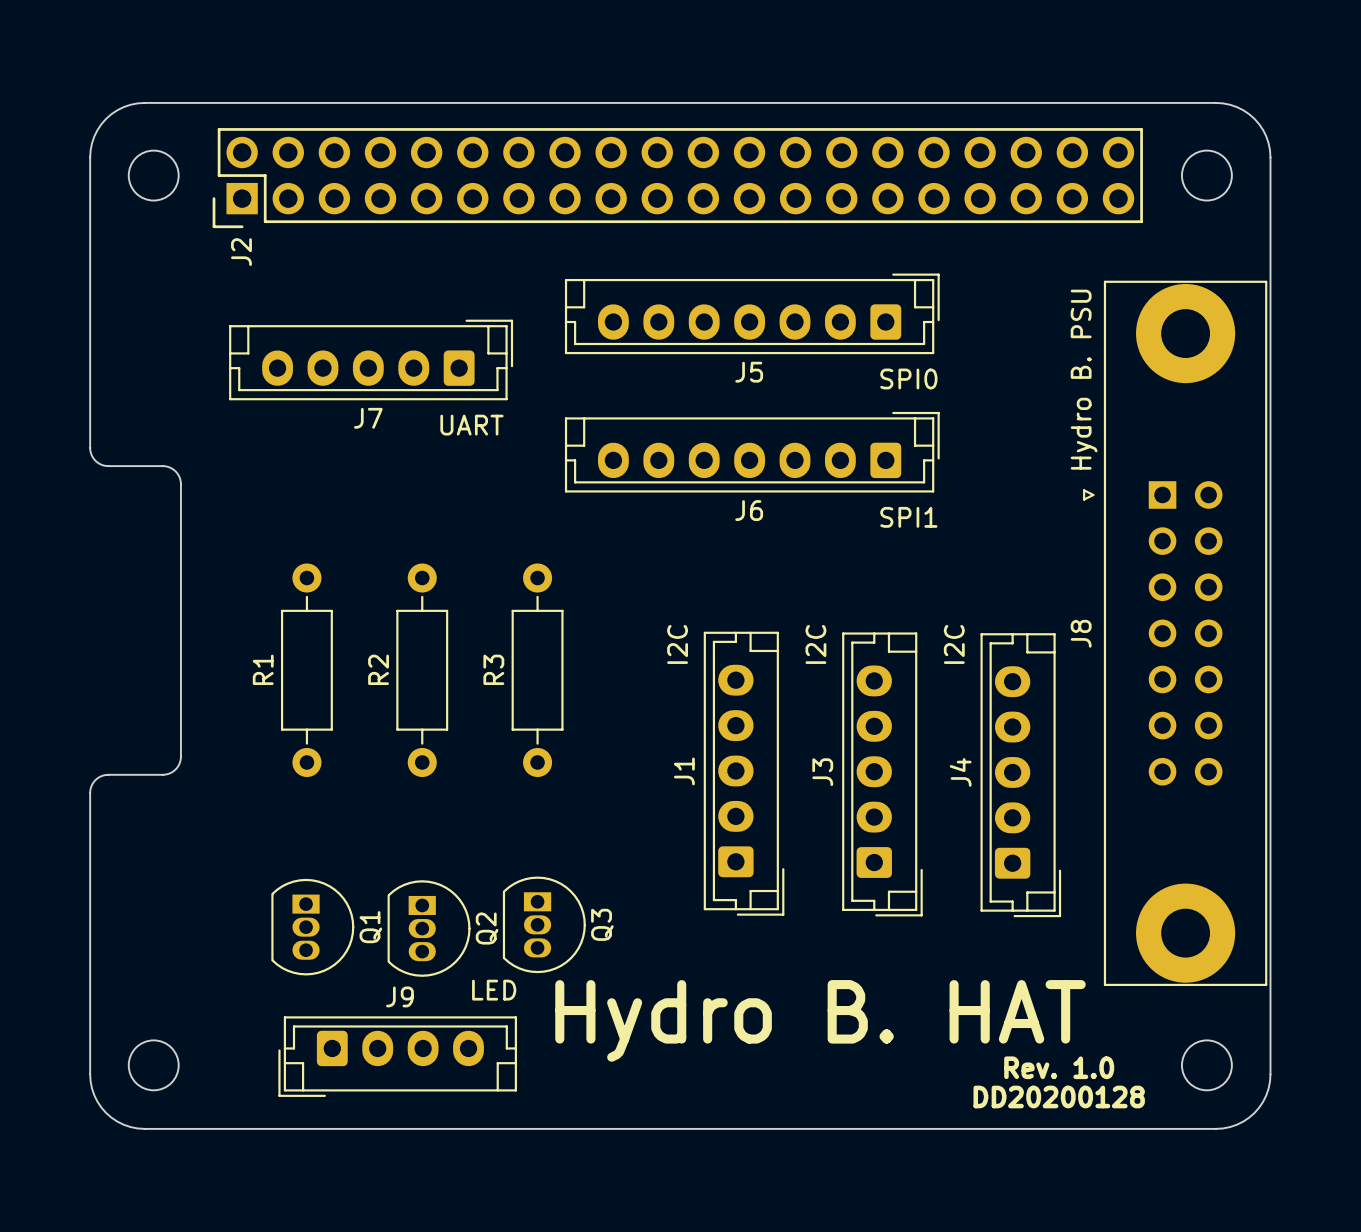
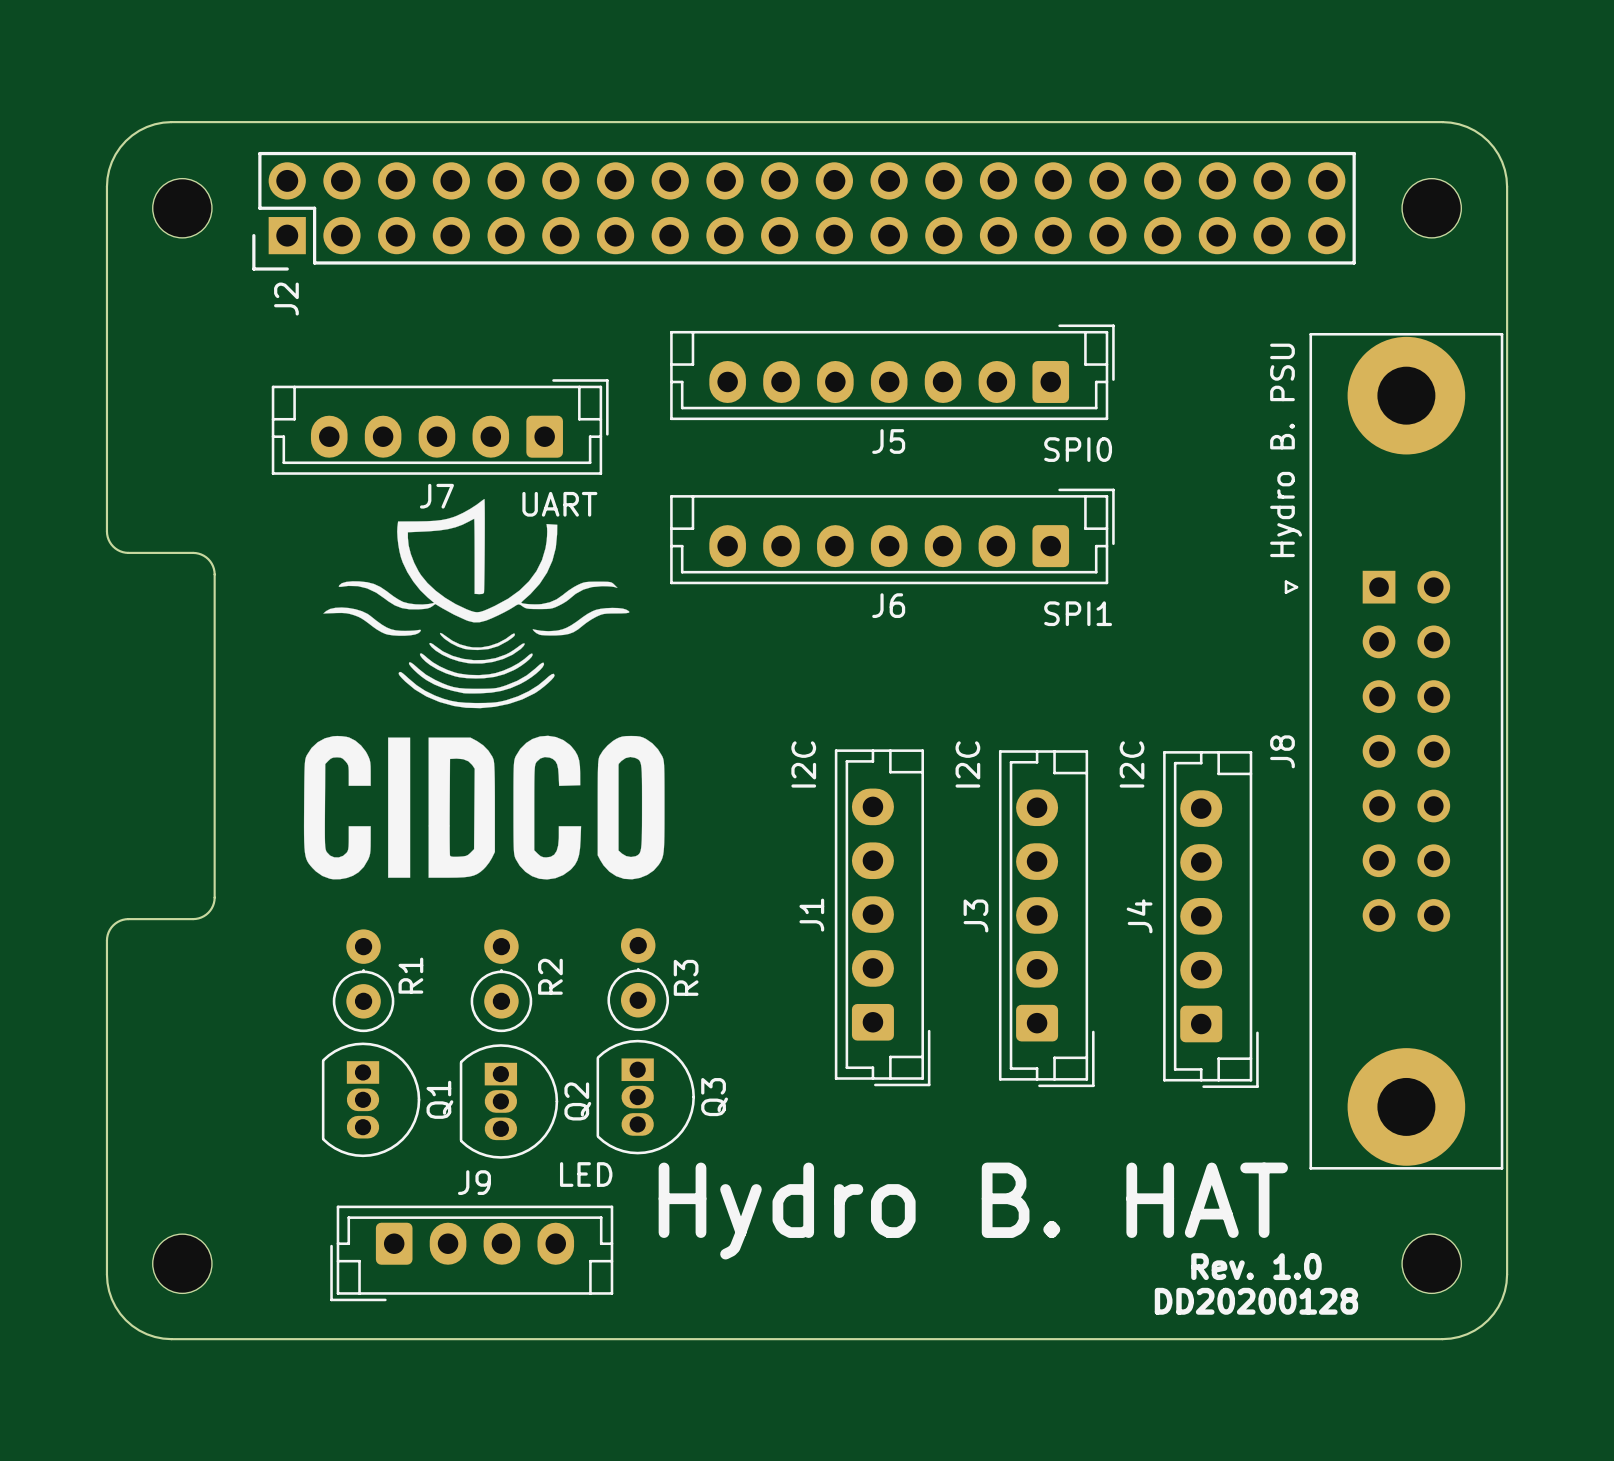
drawing: none -> [303, 498, 665, 880]
R1 footprint: [280, 563, 333, 778] -> [332, 929, 395, 1033]
R2 footprint: [396, 563, 449, 778] -> [470, 929, 533, 1033]
R3 footprint: [511, 563, 564, 778] -> [607, 928, 670, 1032]
R1 name position: R1 (263, 669) -> R1 (410, 975)
R2 name position: R2 (378, 669) -> R2 (550, 976)
R3 name position: R3 (493, 669) -> R3 (686, 977)

